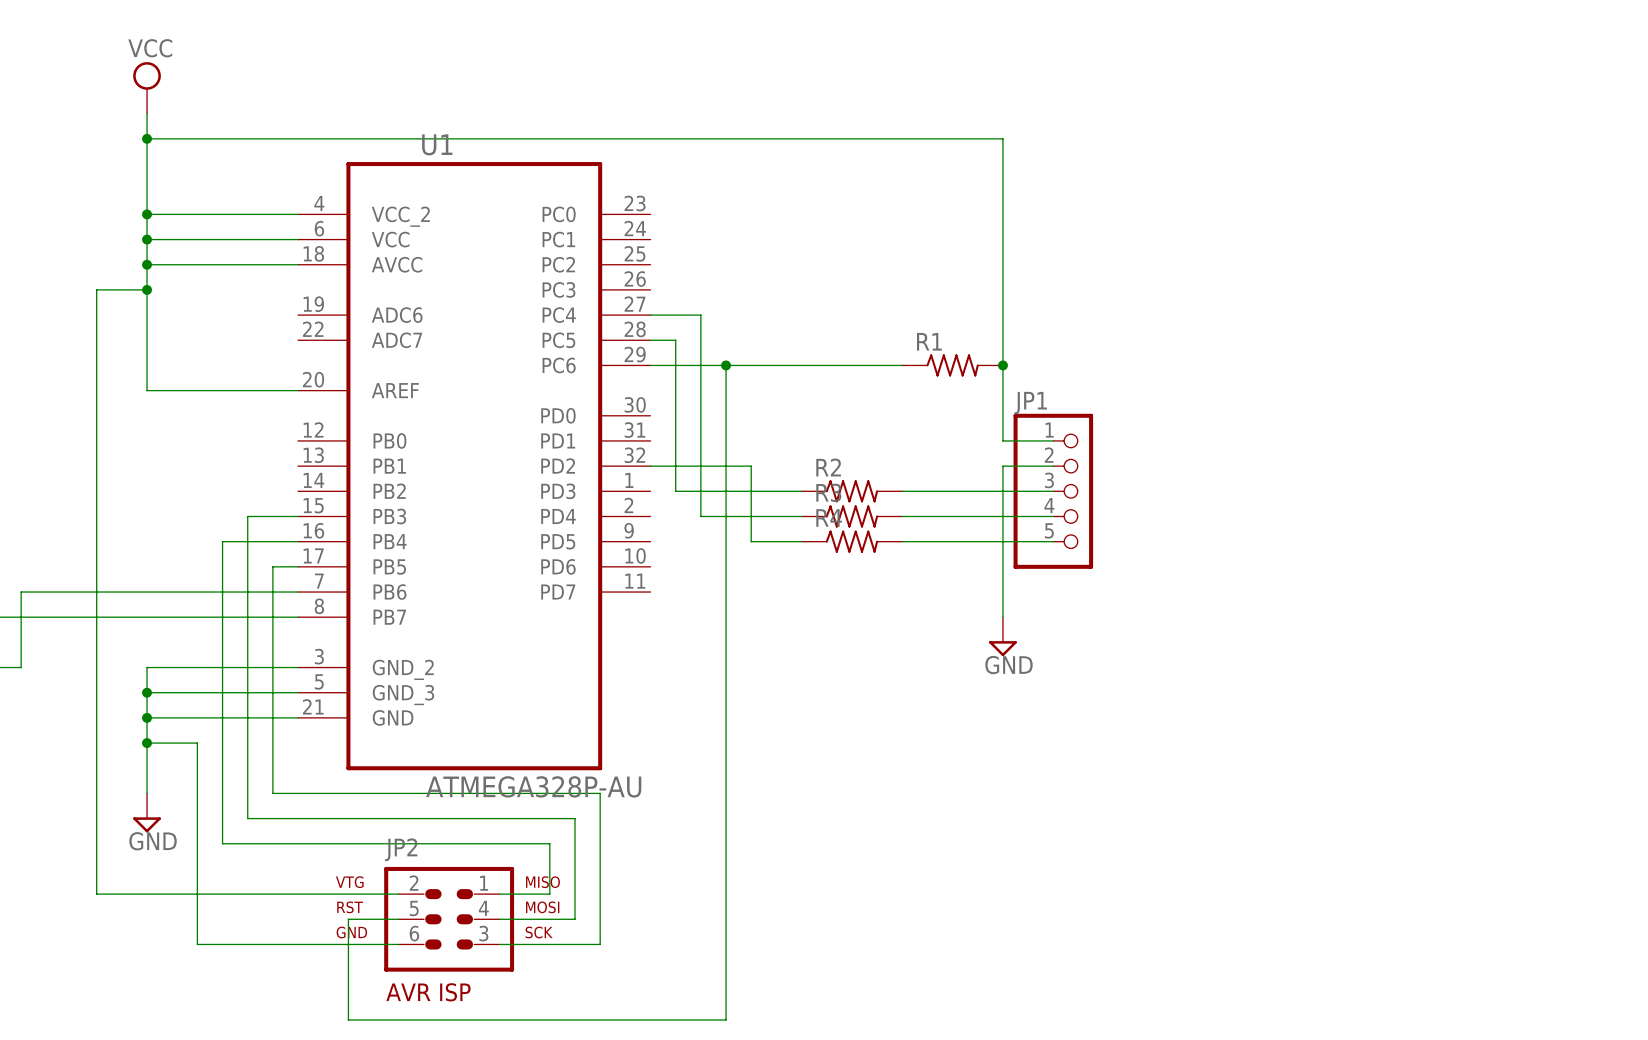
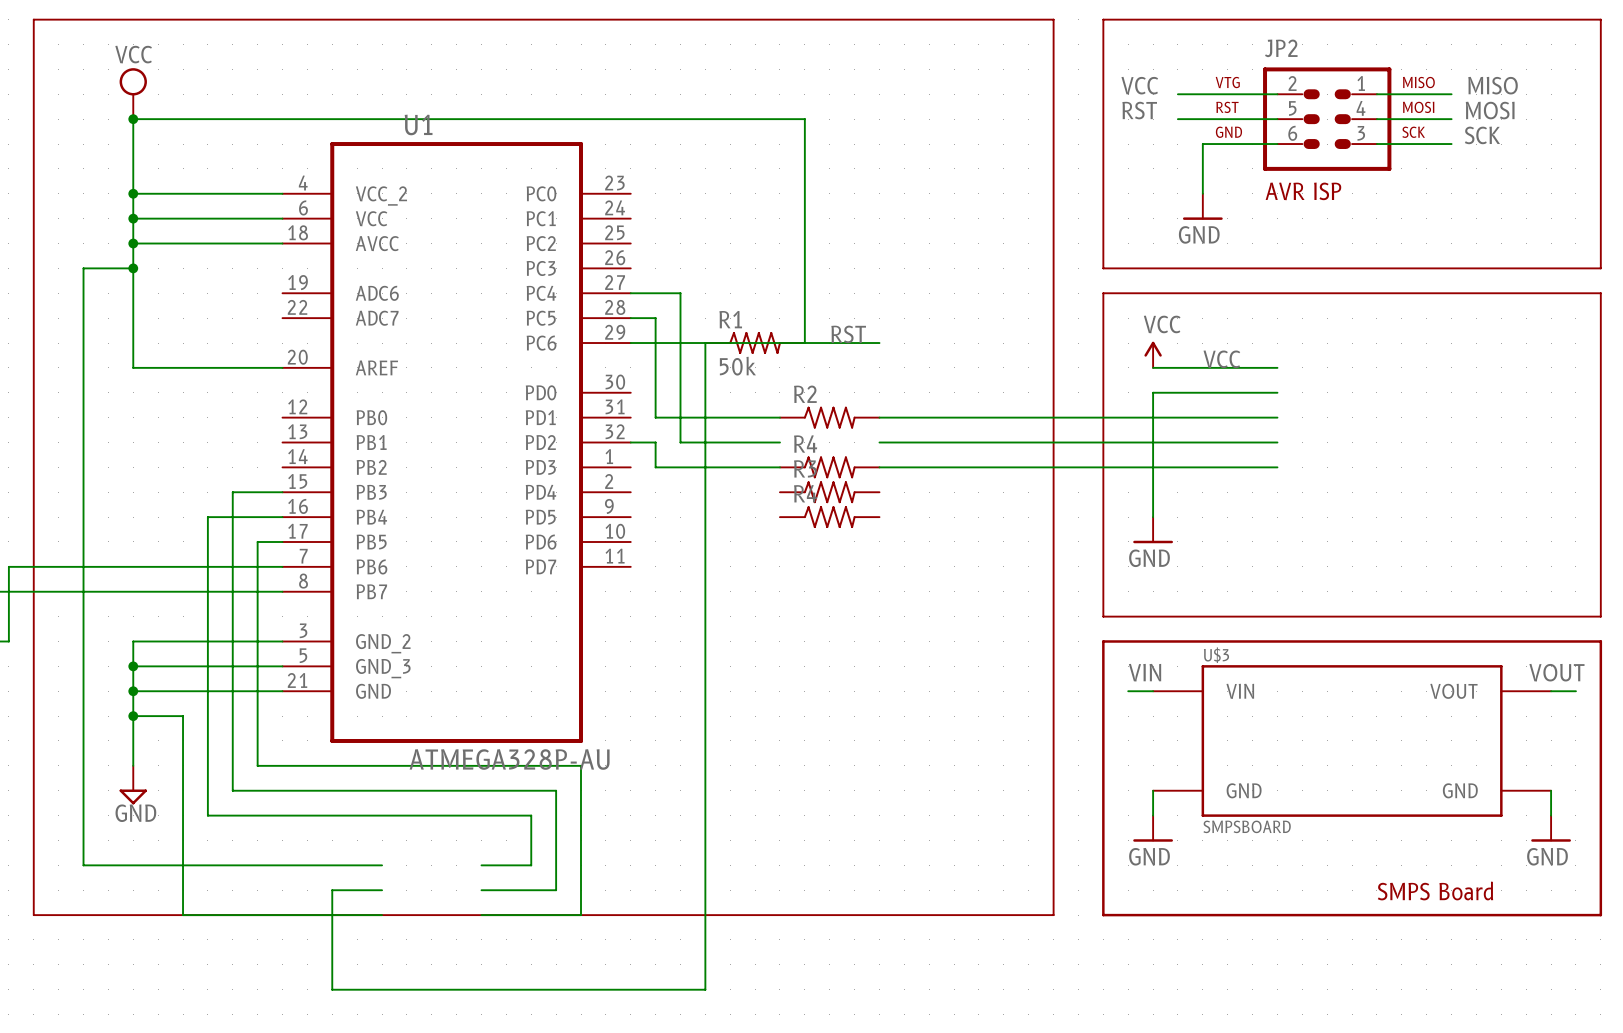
line: none -> (33, 19) (1053, 19) (1053, 915) (33, 915) (33, 19)
line: none -> (1103, 19) (1103, 268) (1600, 268) (1600, 19) (1103, 19)
power symbol position: VCC (147, 87) -> VCC (133, 93)
label: none -> VCC (1139, 85)
label: none -> MISO (1493, 85)
wire: none -> (1177, 94) (1277, 94)
wire: none -> (1376, 94) (1451, 94)
label: none -> RST (1139, 110)
label: none -> MOSI (1490, 110)
wire: (826, 138) (1002, 138) (1002, 440) -> (804, 119) (804, 343)
wire: none -> (1177, 119) (1277, 119)
wire: none -> (1376, 119) (1451, 119)
label: none -> SCK (1482, 135)
wire: none -> (1277, 144) (1202, 144) (1202, 193)
wire: none -> (1376, 144) (1451, 144)
power symbol: none -> GND (1202, 206)
line: none -> (1103, 293) (1103, 616) (1600, 616) (1600, 293) (1103, 293)
label: none -> RST (848, 334)
junction: (726, 365) -> none
R1 position: (952, 365) -> (755, 343)
junction: (1002, 365) -> none
power symbol: none -> VCC (1153, 354)
label: none -> VCC (1221, 359)
R1 value: none -> 50k (737, 366)
wire: none -> (1153, 367) (1277, 367)
wire: none -> (1277, 392) (1153, 392) (1153, 517)
wire: (675, 440) (675, 466) (700, 466) (700, 516) (801, 516) -> (655, 417) (779, 417)
R2: none -> (829, 417)
wire: none -> (879, 417) (978, 417)
wire: none -> (1028, 417) (1277, 417)
wire: (751, 466) (751, 541) (801, 541) -> (730, 442) (779, 442)
wire: (1002, 466) (1002, 617) -> (978, 442) (879, 442)
wire: none -> (1028, 442) (1277, 442)
R2 name: R2 (828, 467) -> R4 (805, 443)
wire: none -> (1028, 467) (1277, 467)
JP1: (1053, 491) -> none
wire: (902, 516) (1053, 516) -> none
wire: (902, 541) (1053, 541) -> none
power symbol: none -> GND (1153, 530)
power symbol: GND (1002, 636) -> none
line: none -> (1103, 641) (1103, 915) (1600, 915) (1600, 641) (1103, 641)
label: none -> VIN (1145, 672)
label: none -> VOUT (1556, 672)
wire: none -> (1128, 691) (1153, 691)
wire: none -> (1551, 691) (1575, 691)
U$3: none -> SMPSBOARD (1352, 740)
wire: none -> (1153, 790) (1153, 815)
wire: none -> (1551, 790) (1551, 815)
power symbol: none -> GND (1153, 828)
power symbol: none -> GND (1551, 828)
JP2 position: (449, 919) -> (1327, 119)
text: none -> SMPS Board (1435, 891)

